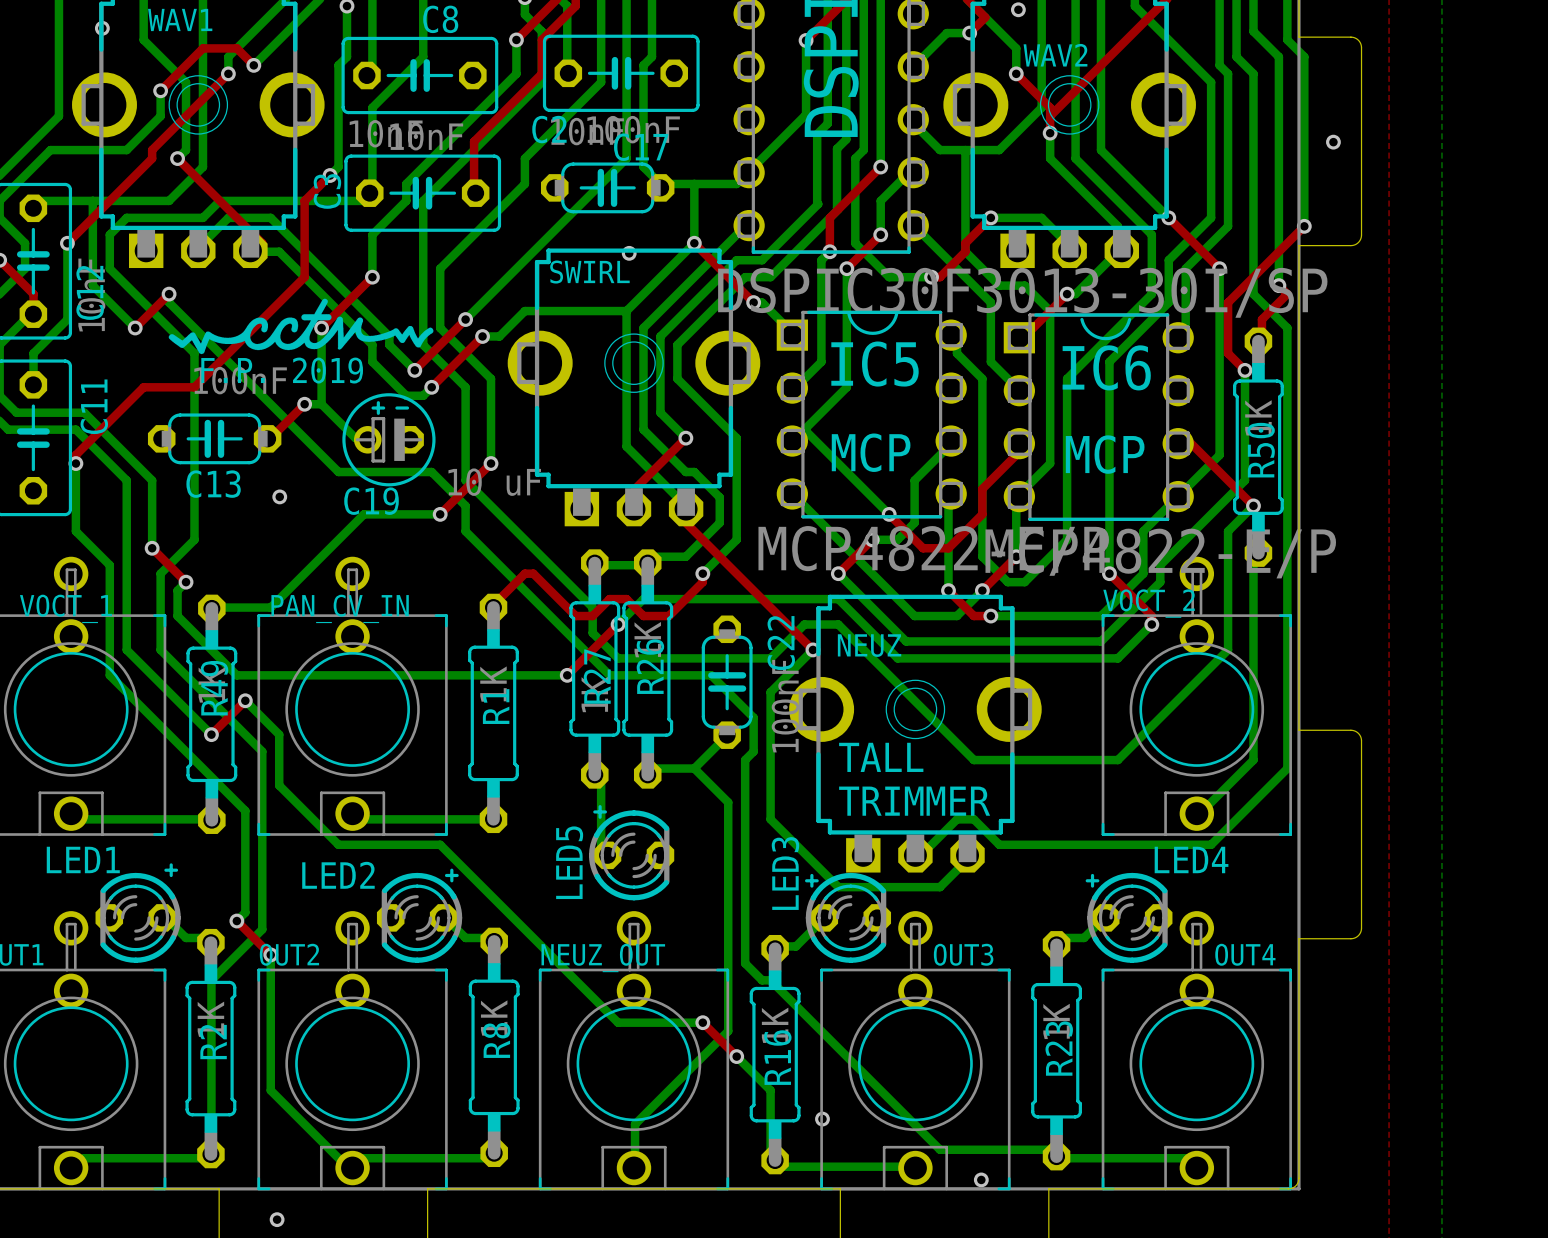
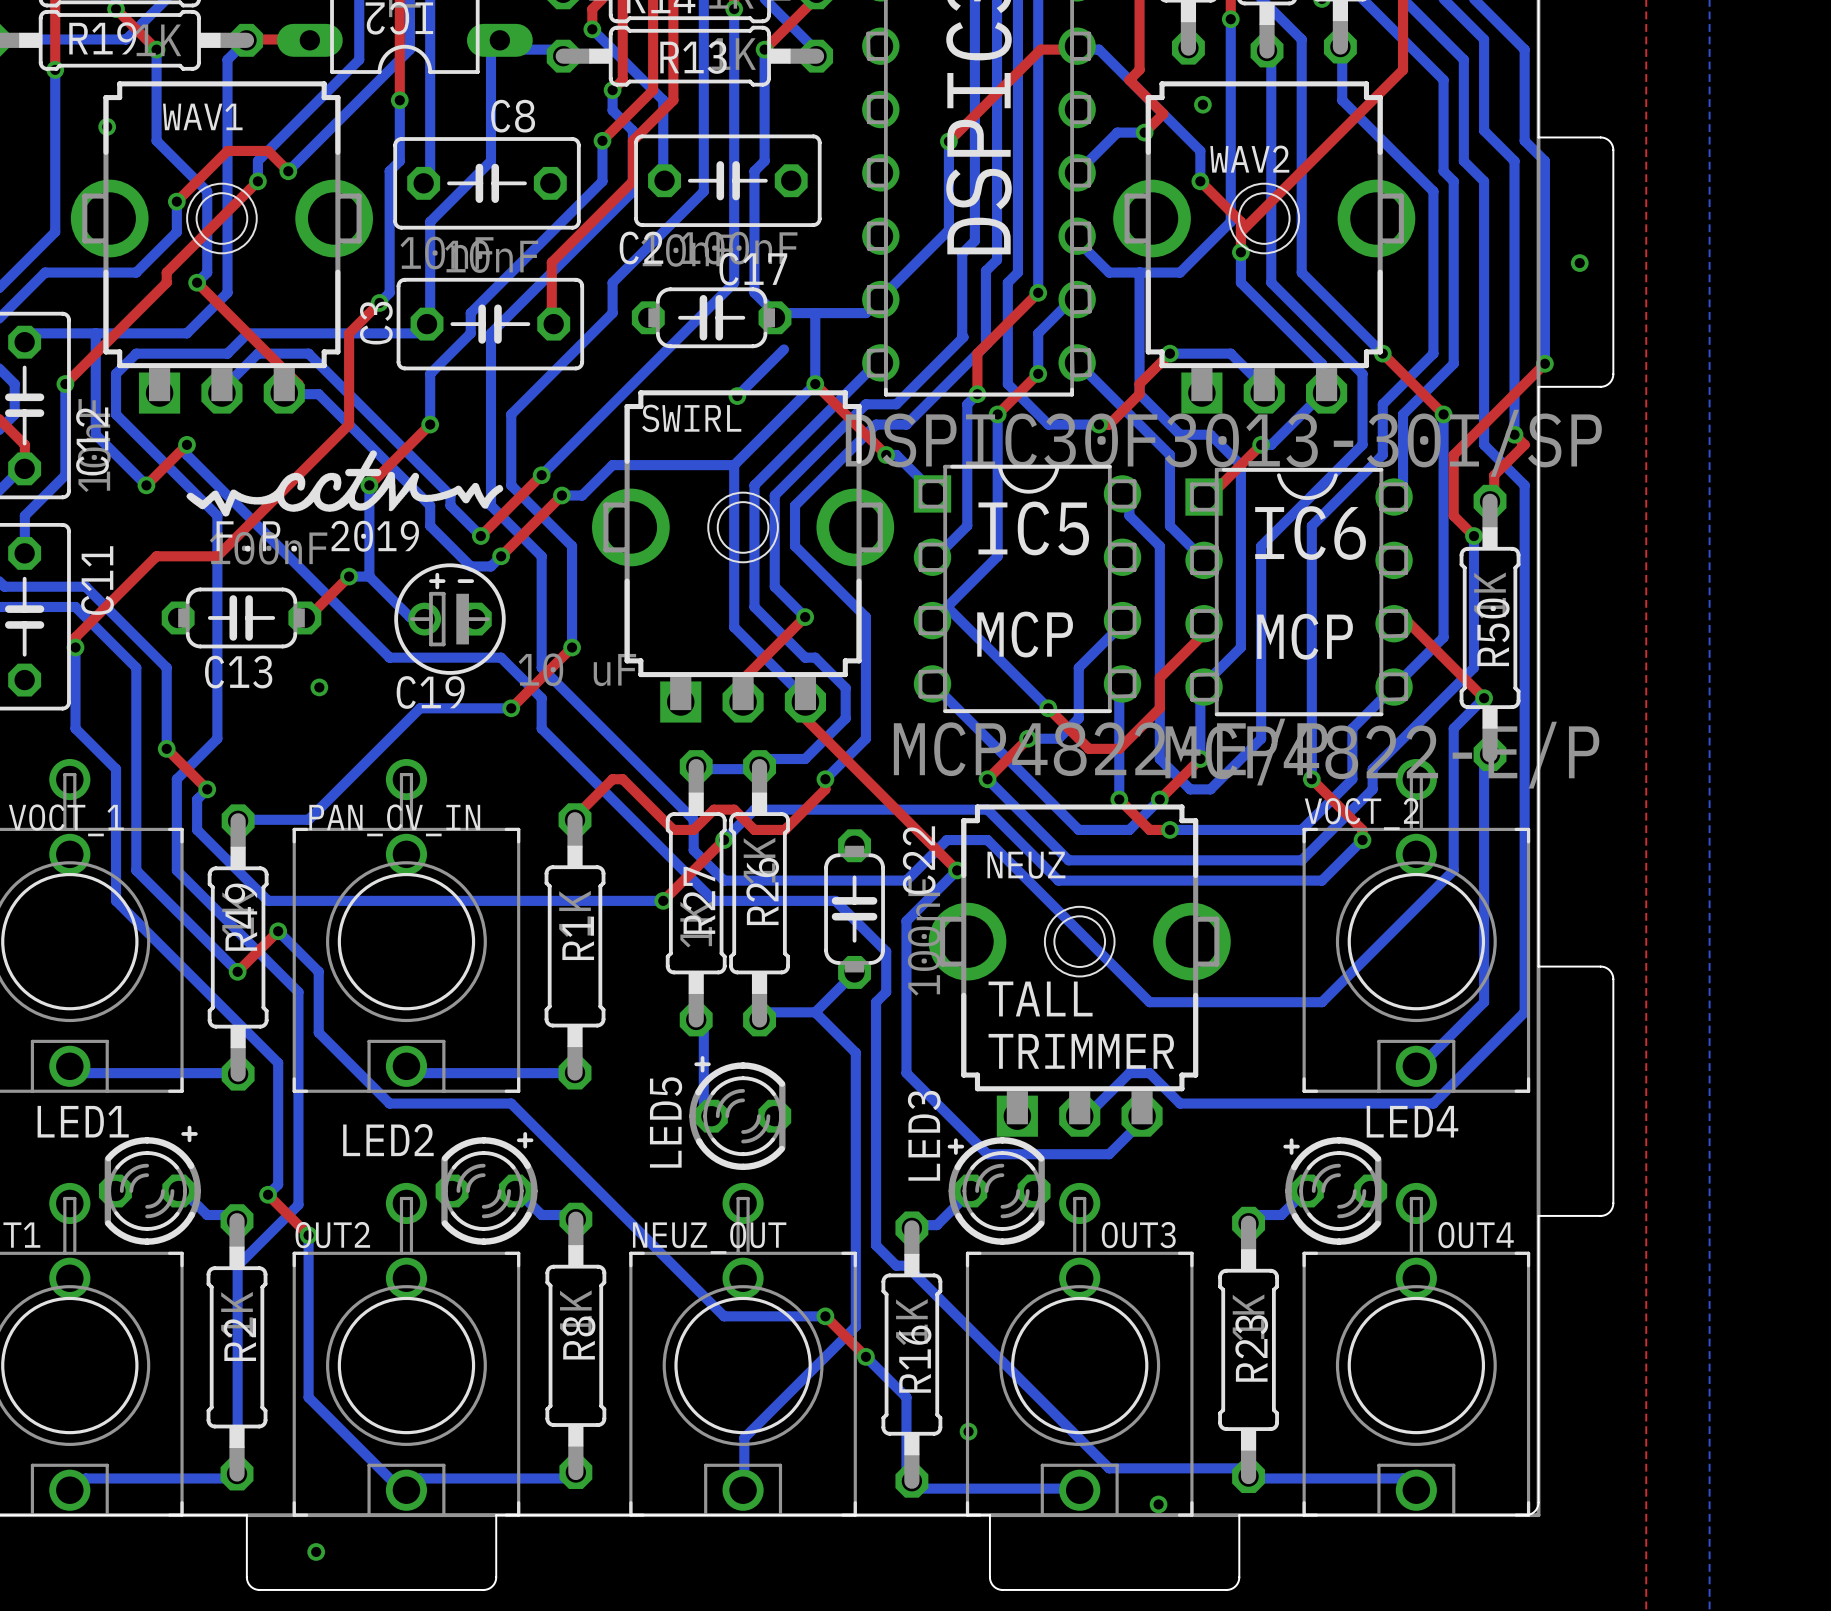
bottom track: none -> (783, 349) (737, 396)

